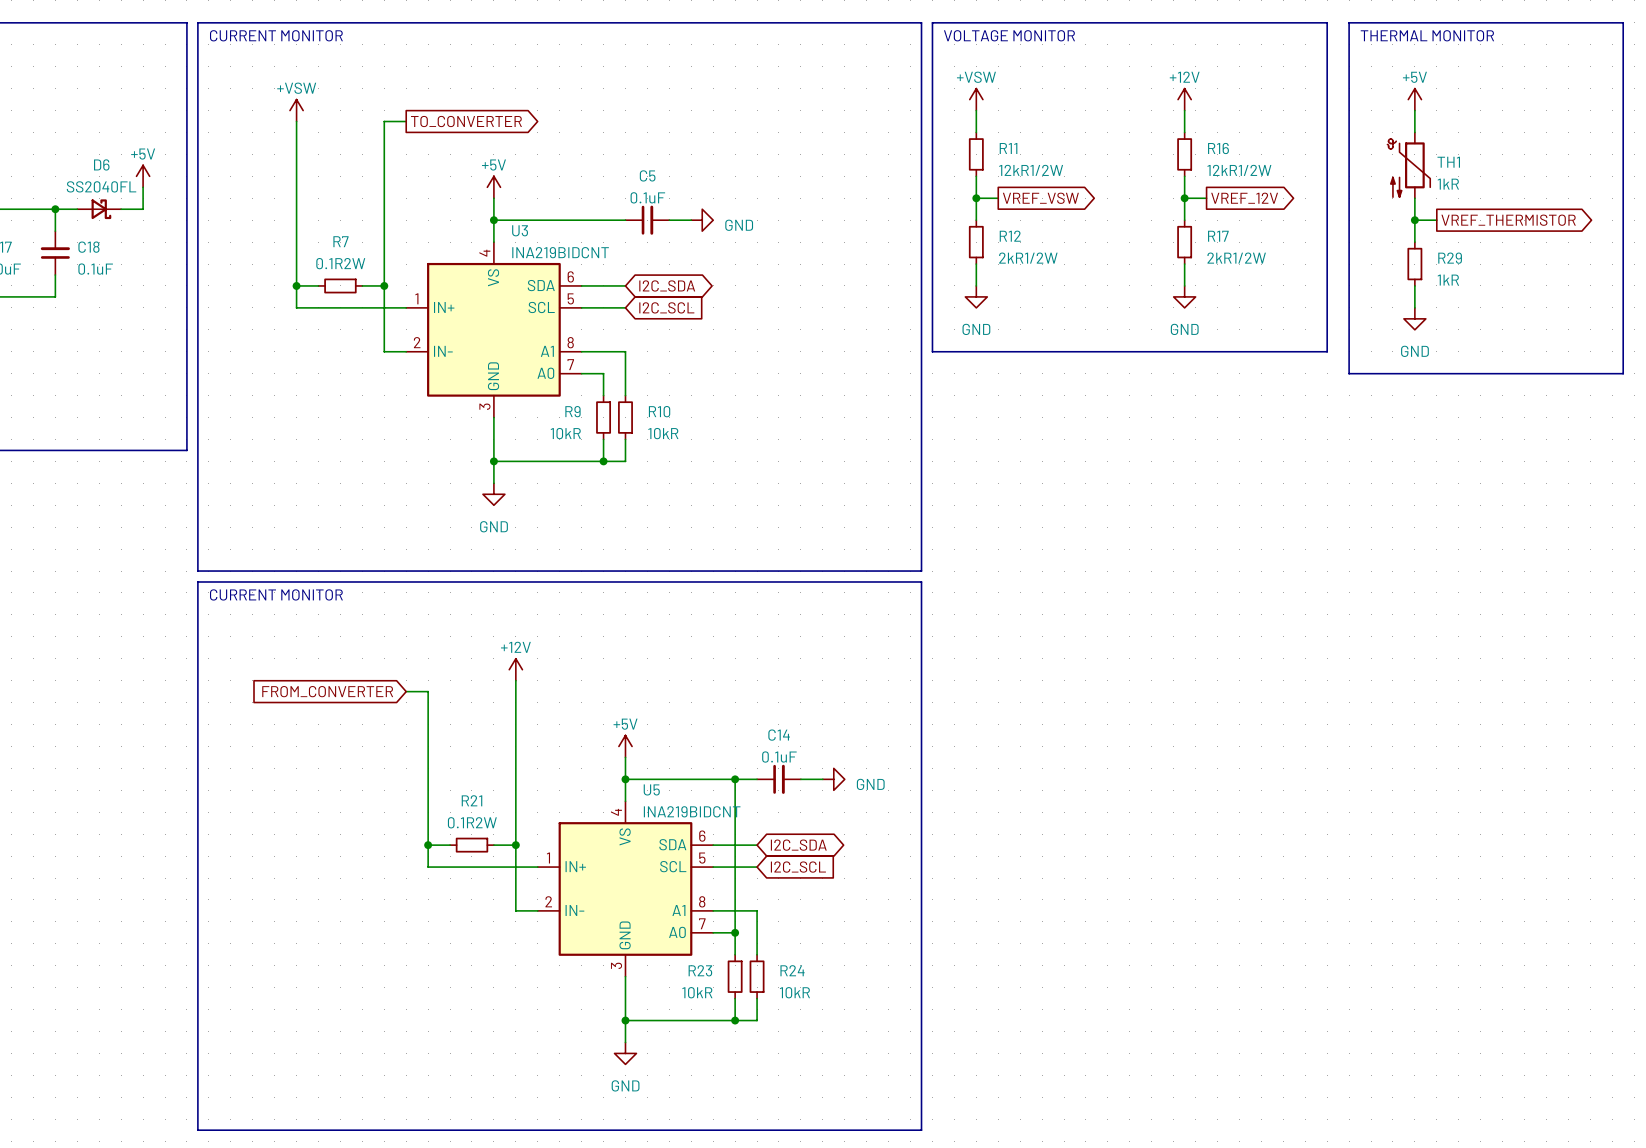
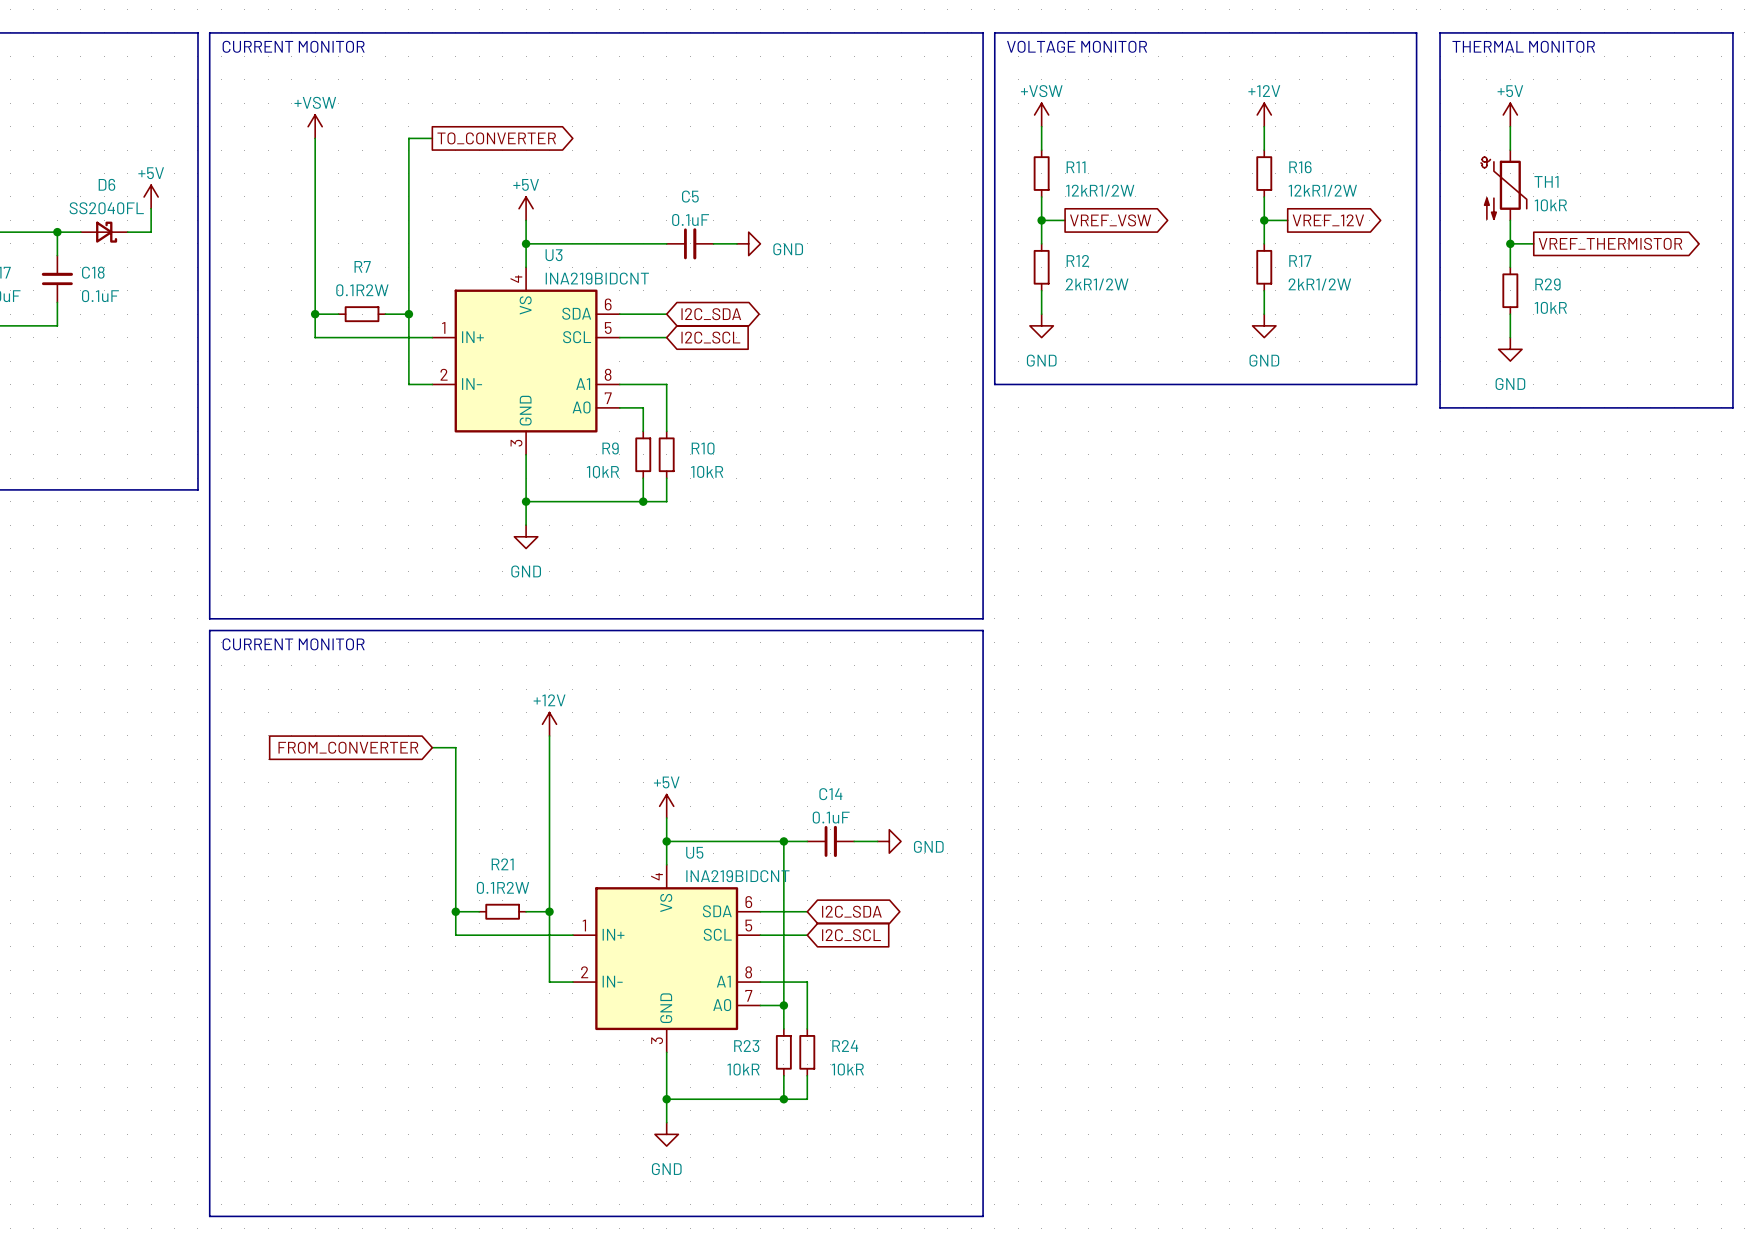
TH1 value: 1kR (1448, 184) -> 10kR (1550, 205)
R29 value: 1kR (1448, 280) -> 10kR (1550, 307)

